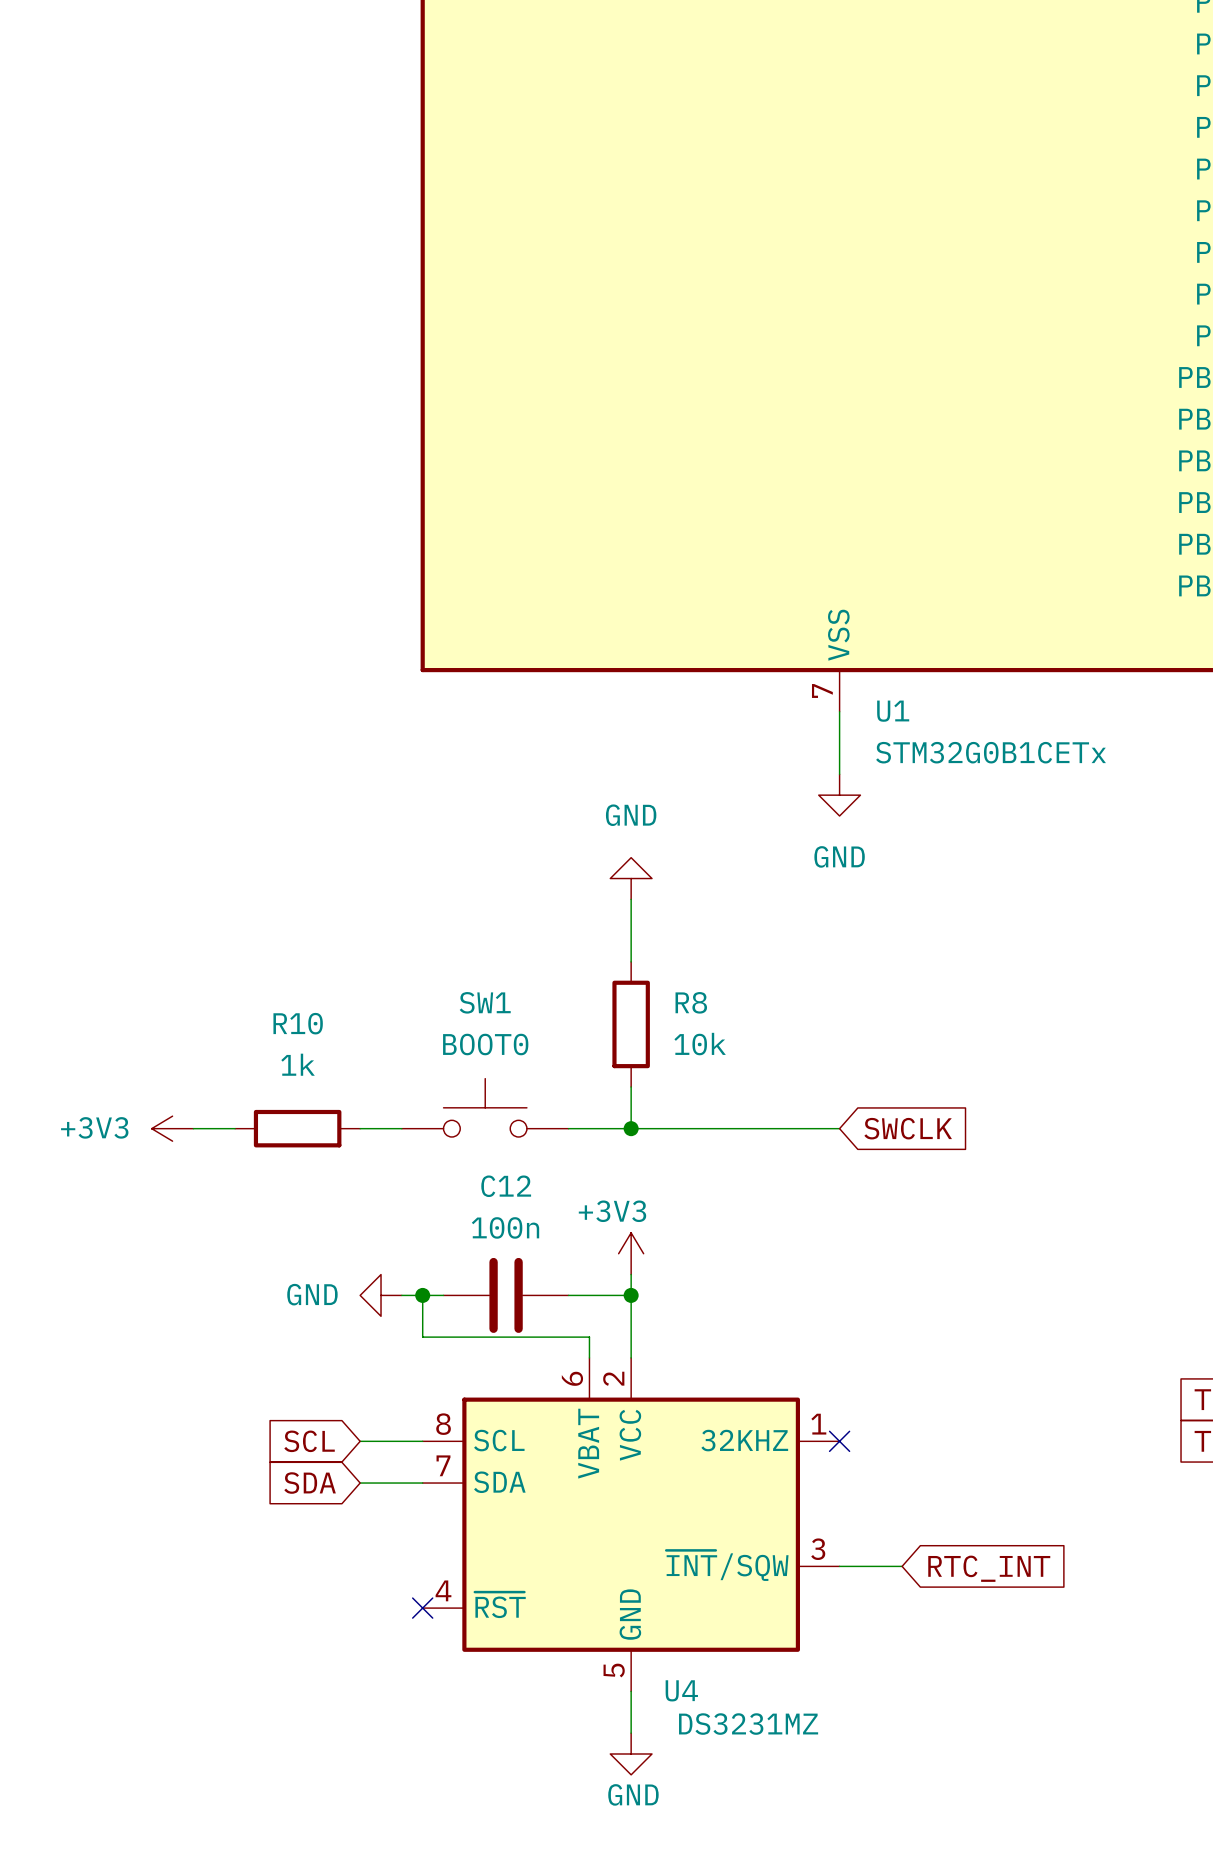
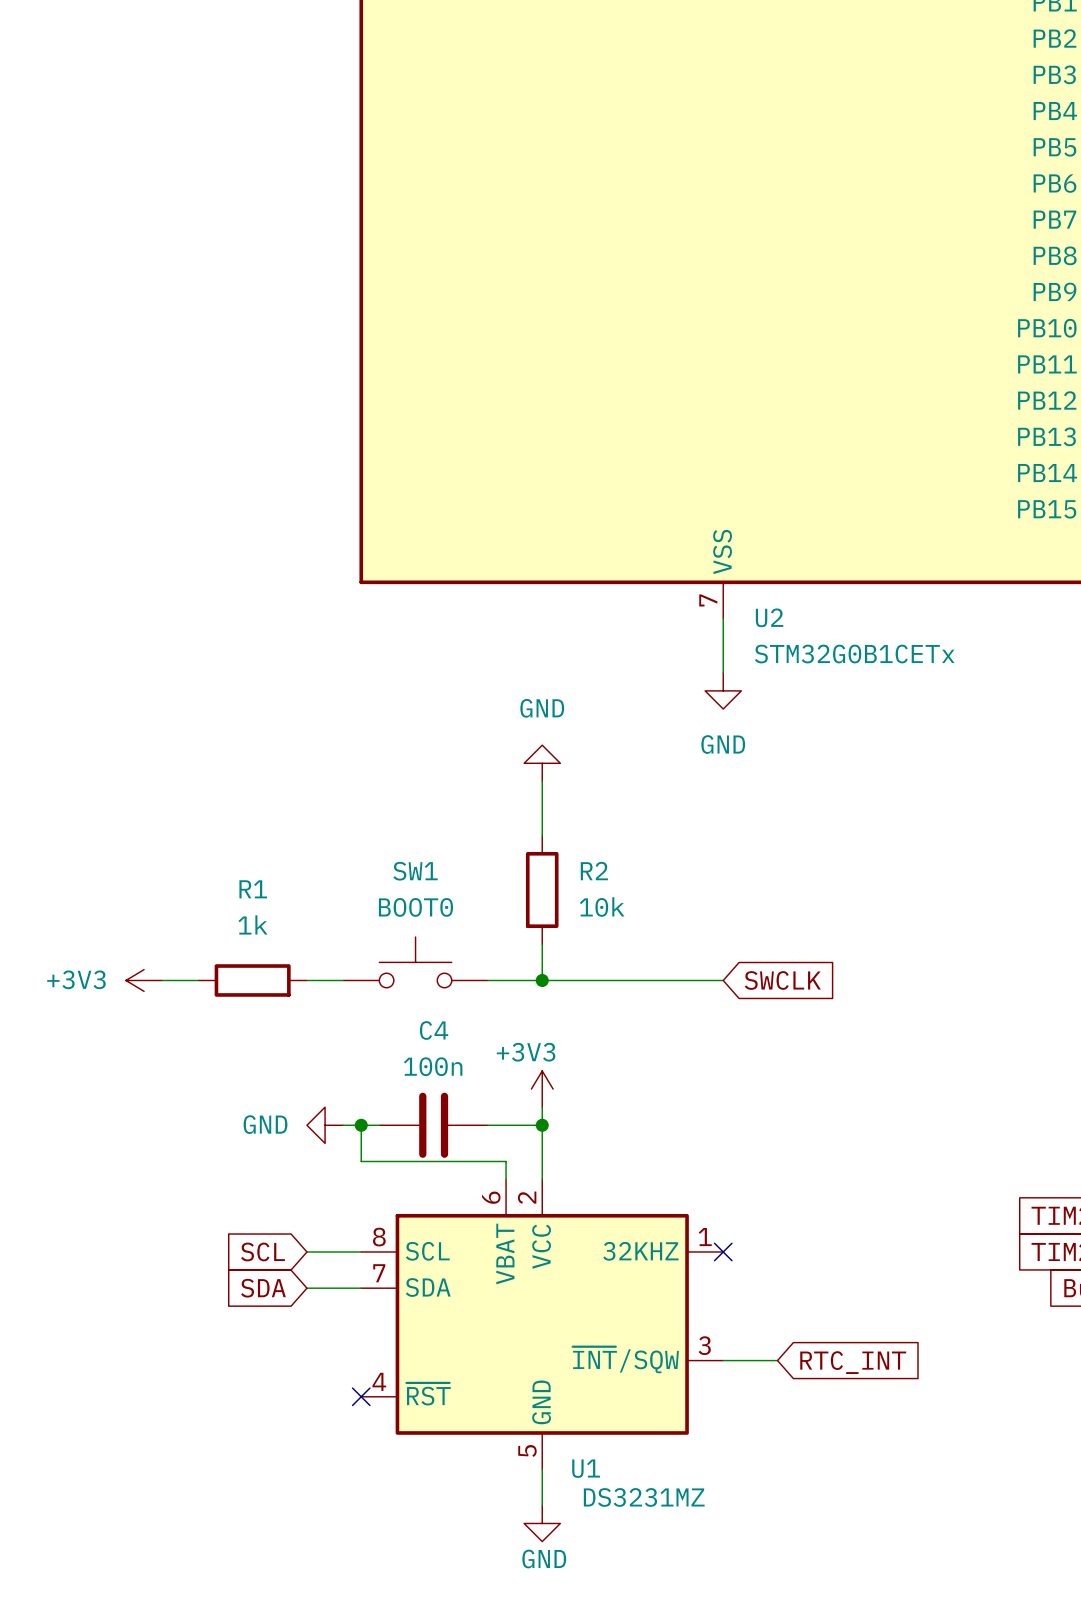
U1 name: U1 (893, 711) -> U2 (769, 617)
R8 name: R8 (691, 1002) -> R2 (594, 871)
R10 name: R10 (298, 1023) -> R1 (253, 889)
C12 name: C12 (506, 1186) -> C4 (434, 1030)
U4 name: U4 (681, 1690) -> U1 (586, 1468)

